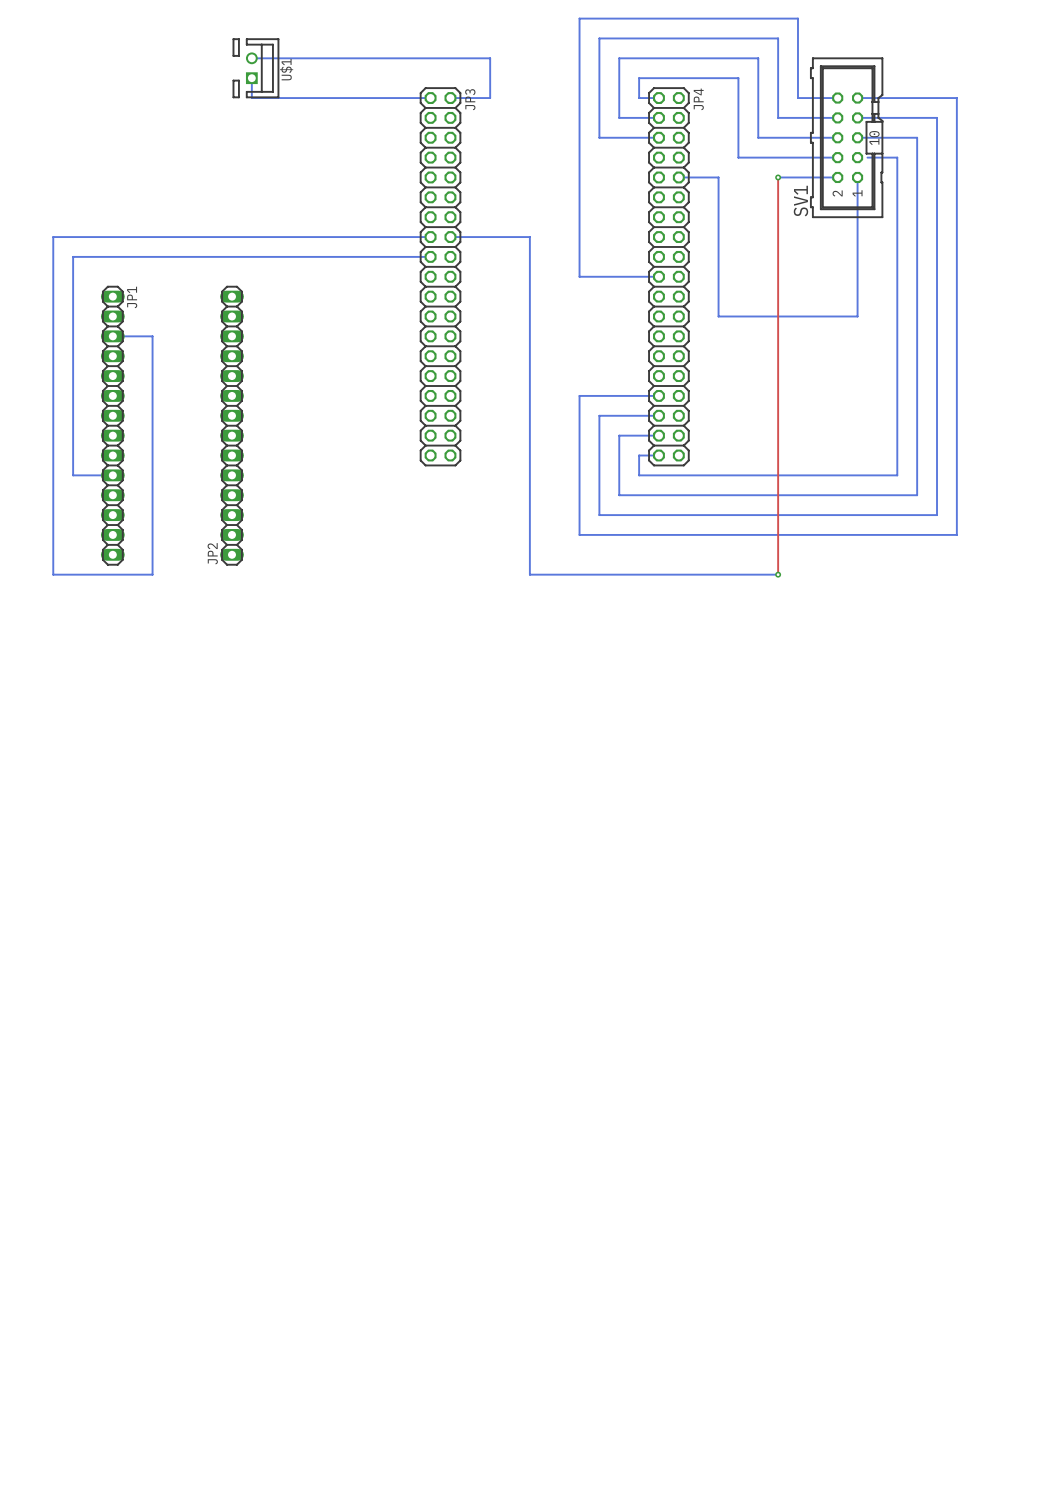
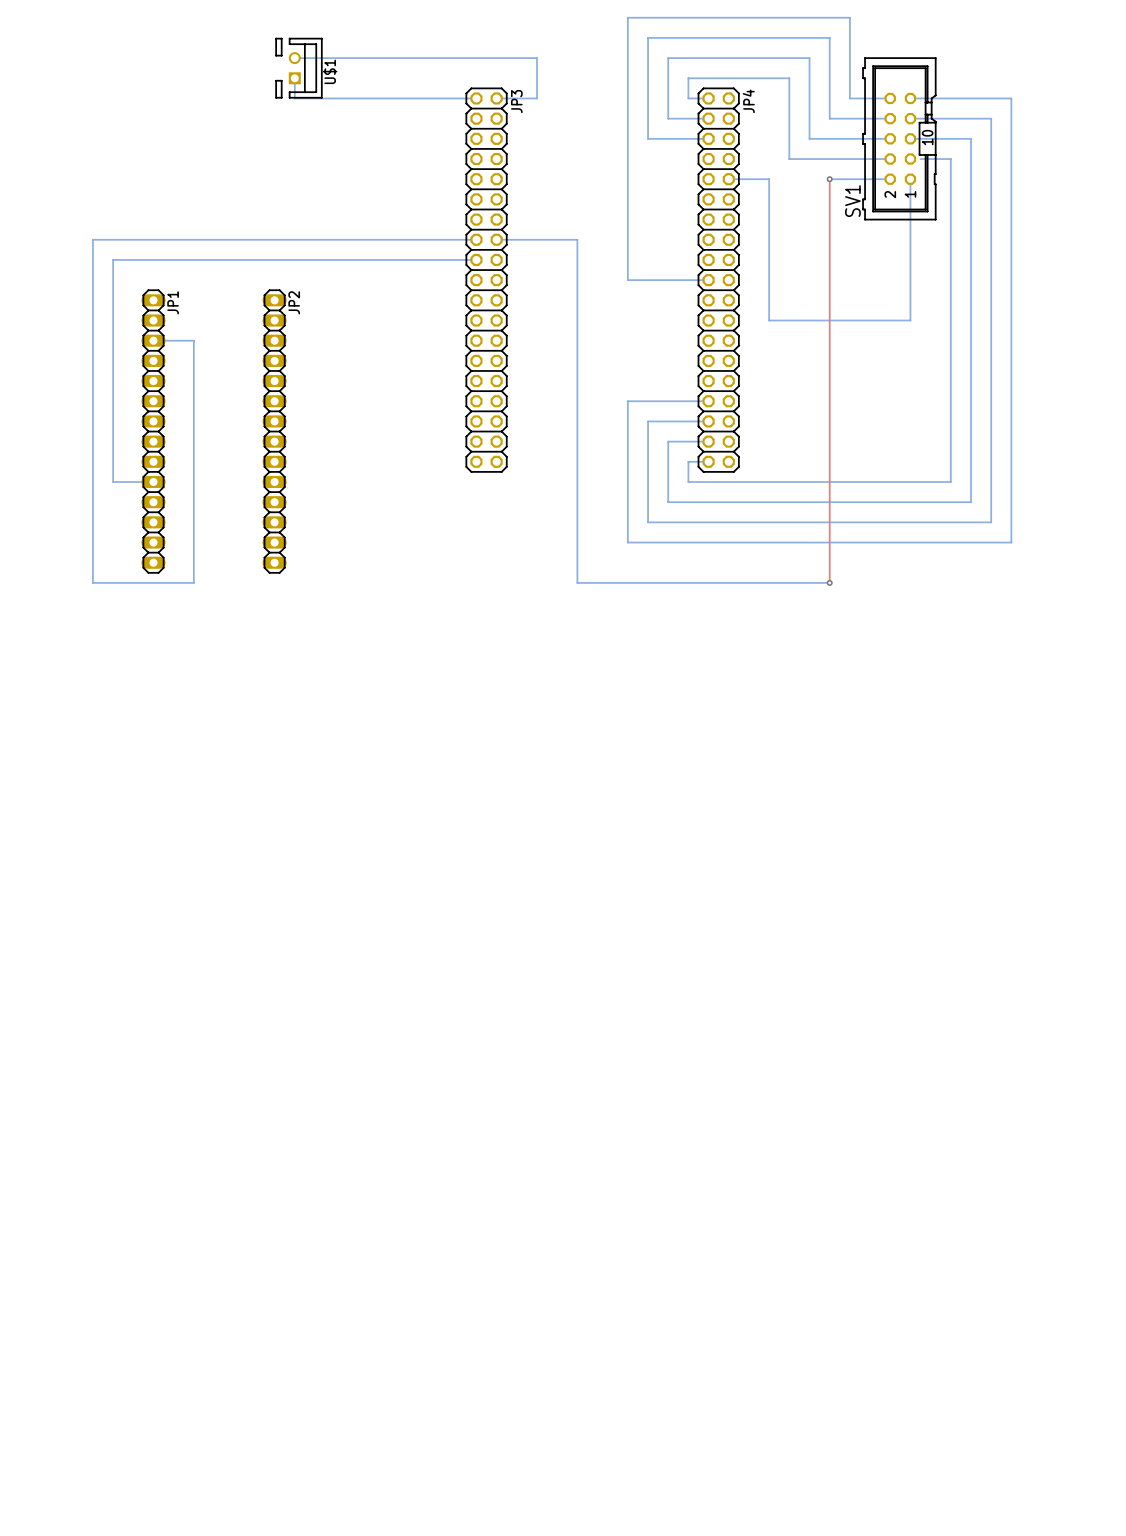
JP2 name position: JP2 (212, 553) -> JP2 (294, 302)

